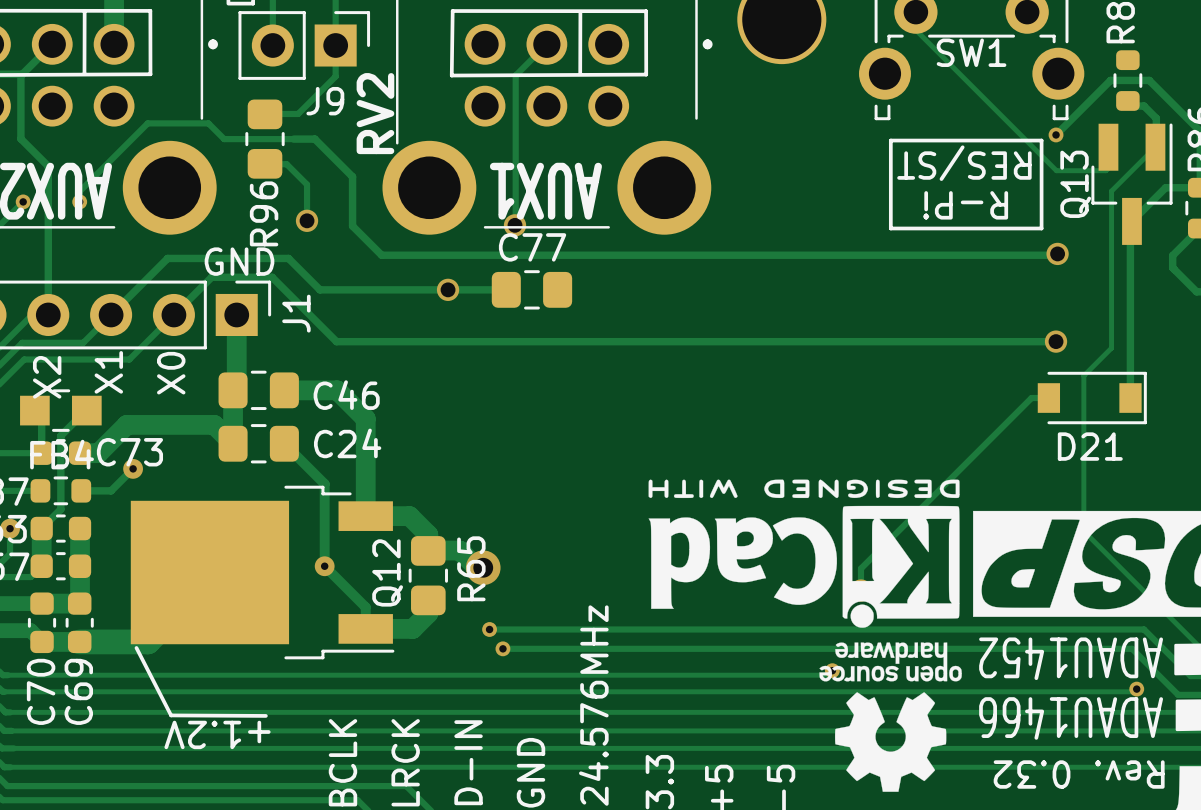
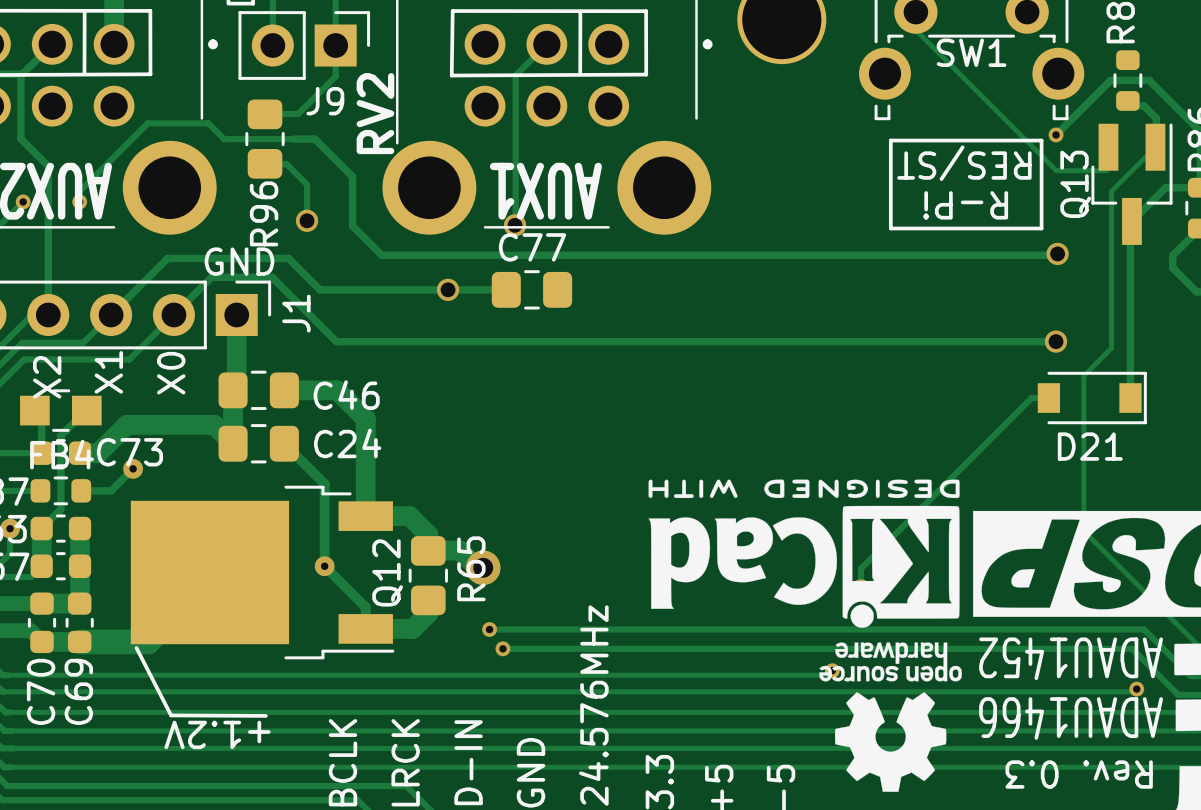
text: Rev. 0.32 (1079, 774) -> Rev. 0.3 (1079, 774)

